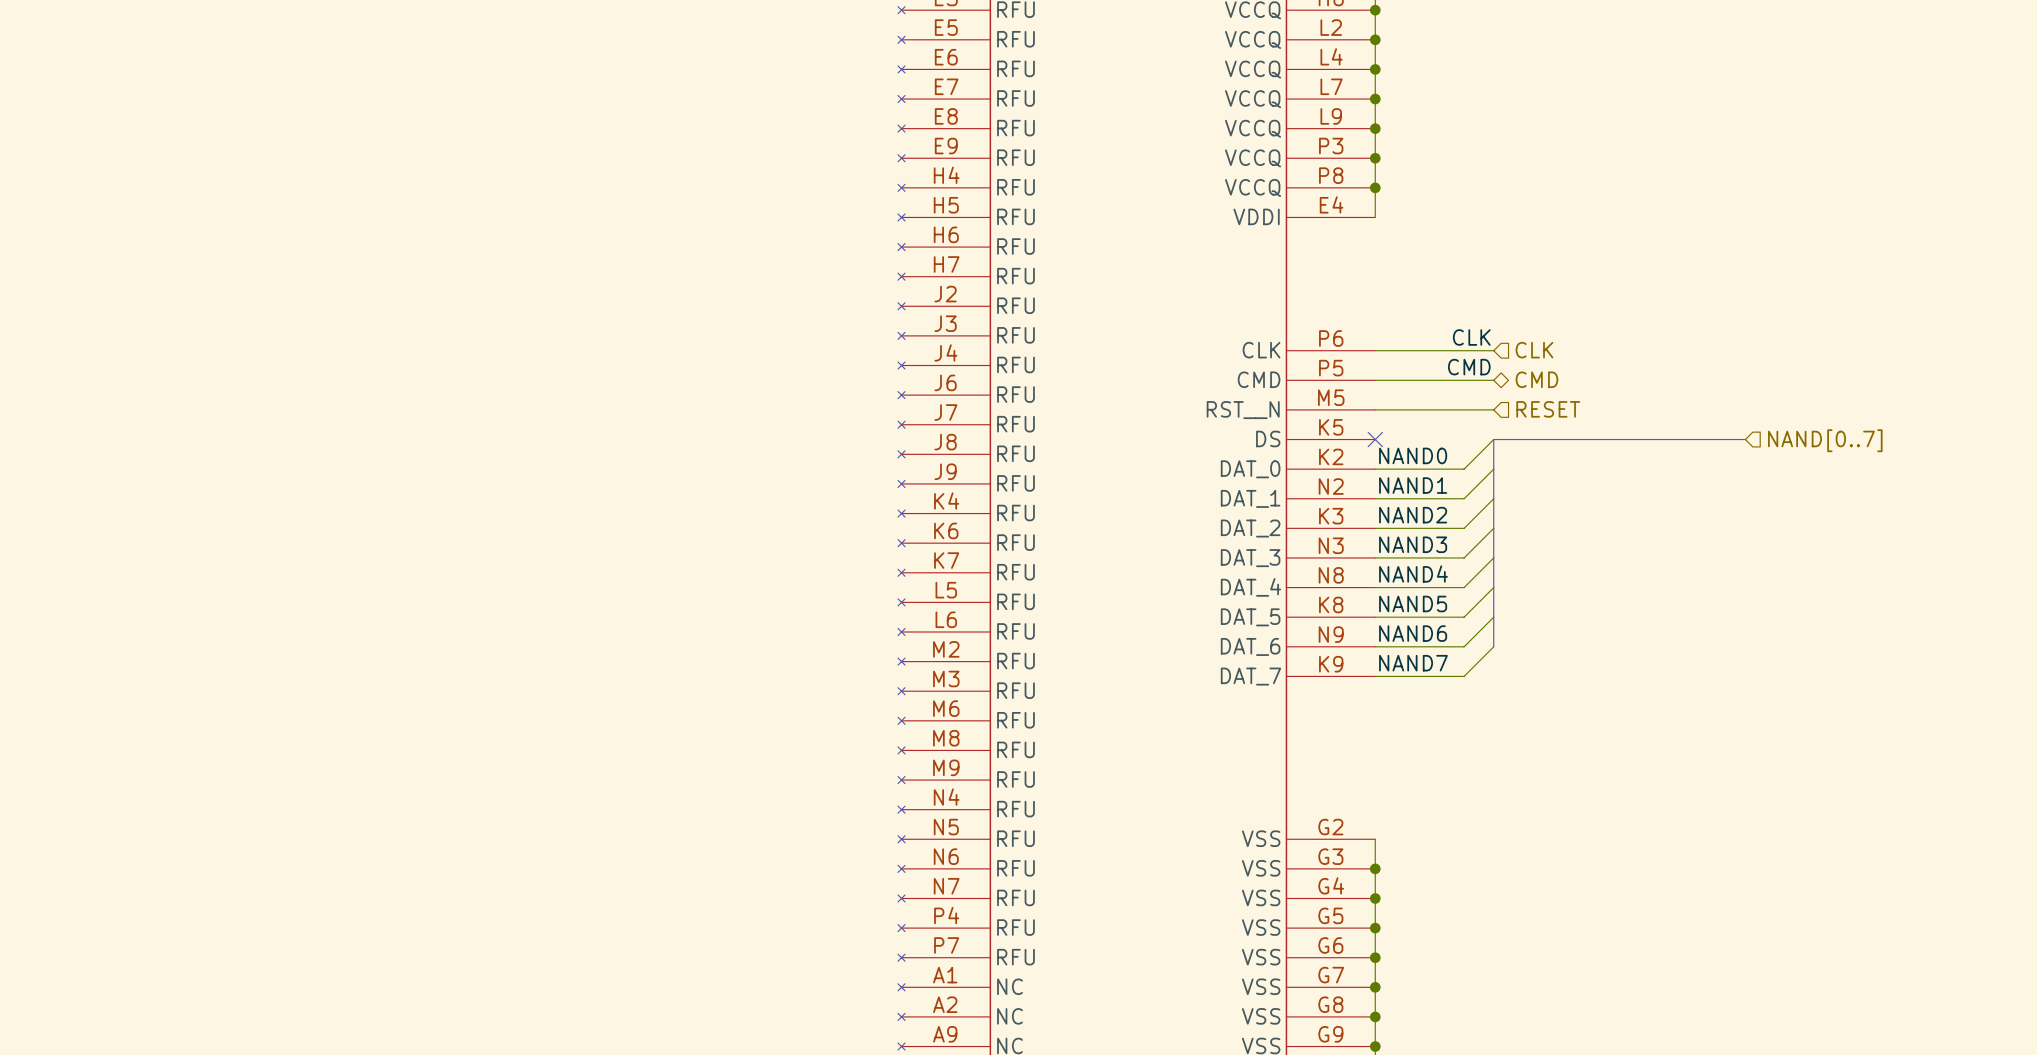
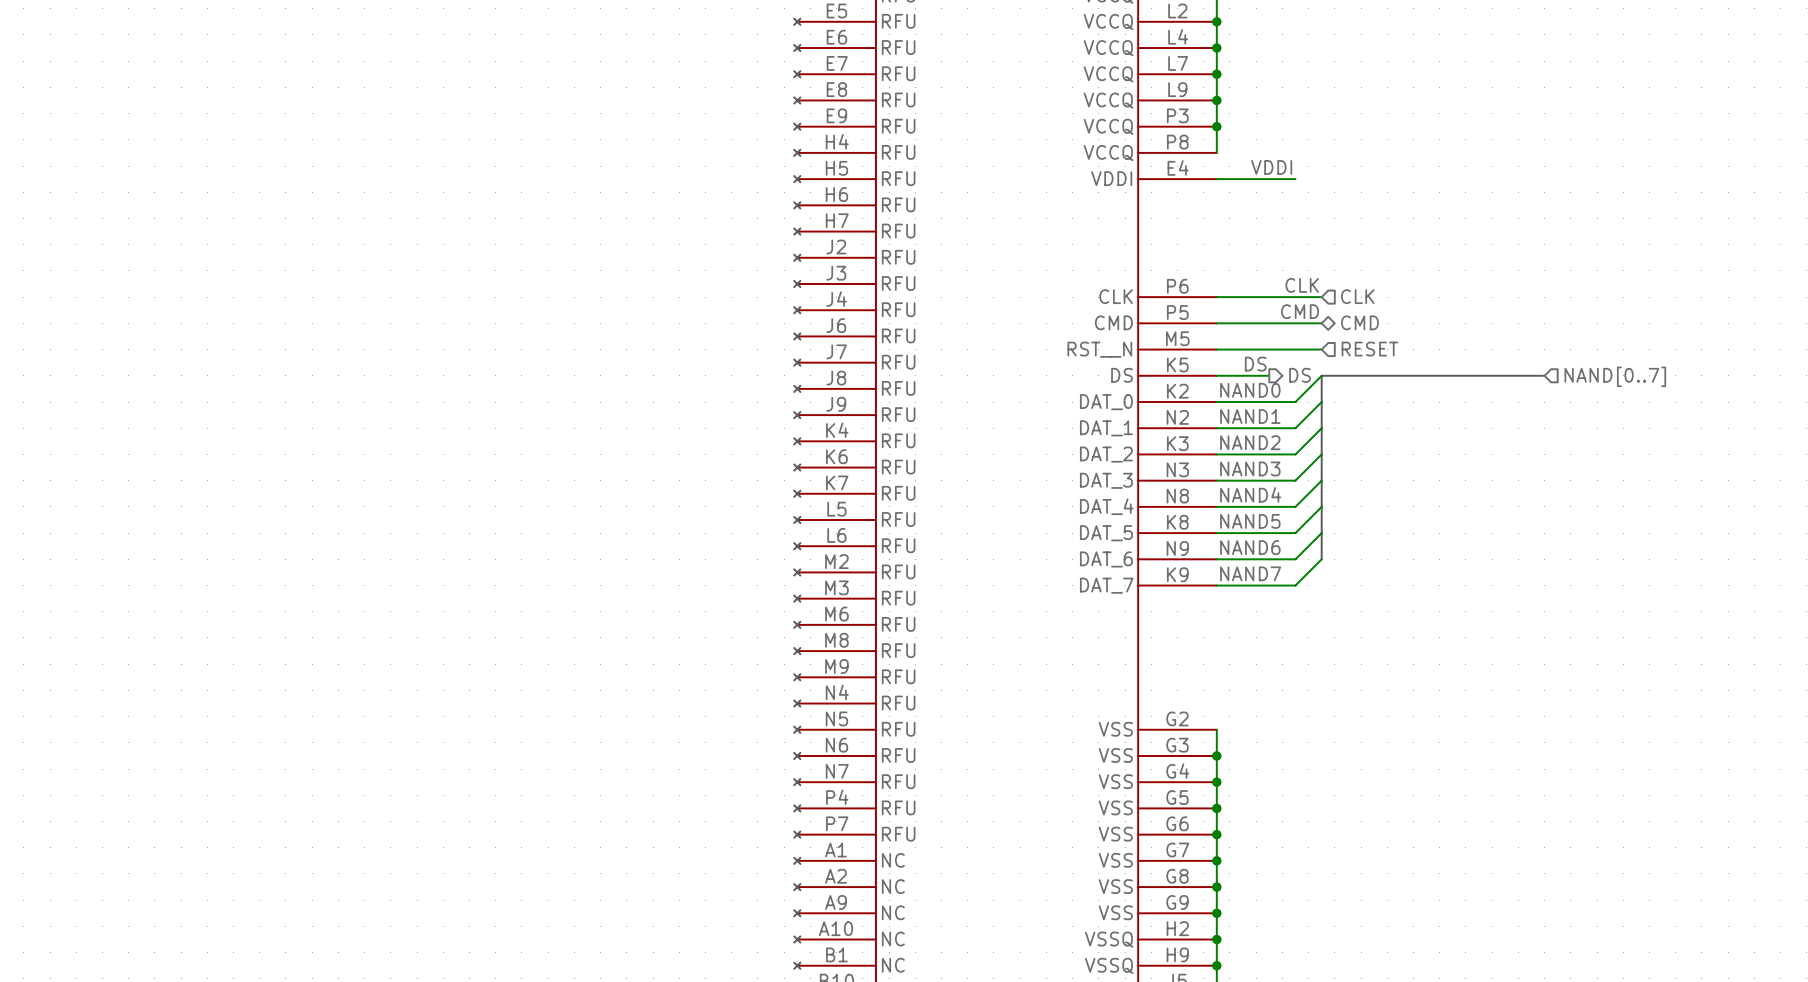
wire: (1375, 187) (1375, 217) -> (1295, 179) (1216, 179)
junction: (1375, 187) -> none
label: none -> VDDI (1271, 167)
label: none -> DS (1255, 364)
hierarchical label: none -> DS (1300, 375)
wire: none -> (1216, 375) (1269, 375)
no-connect mark: (1375, 439) -> none

